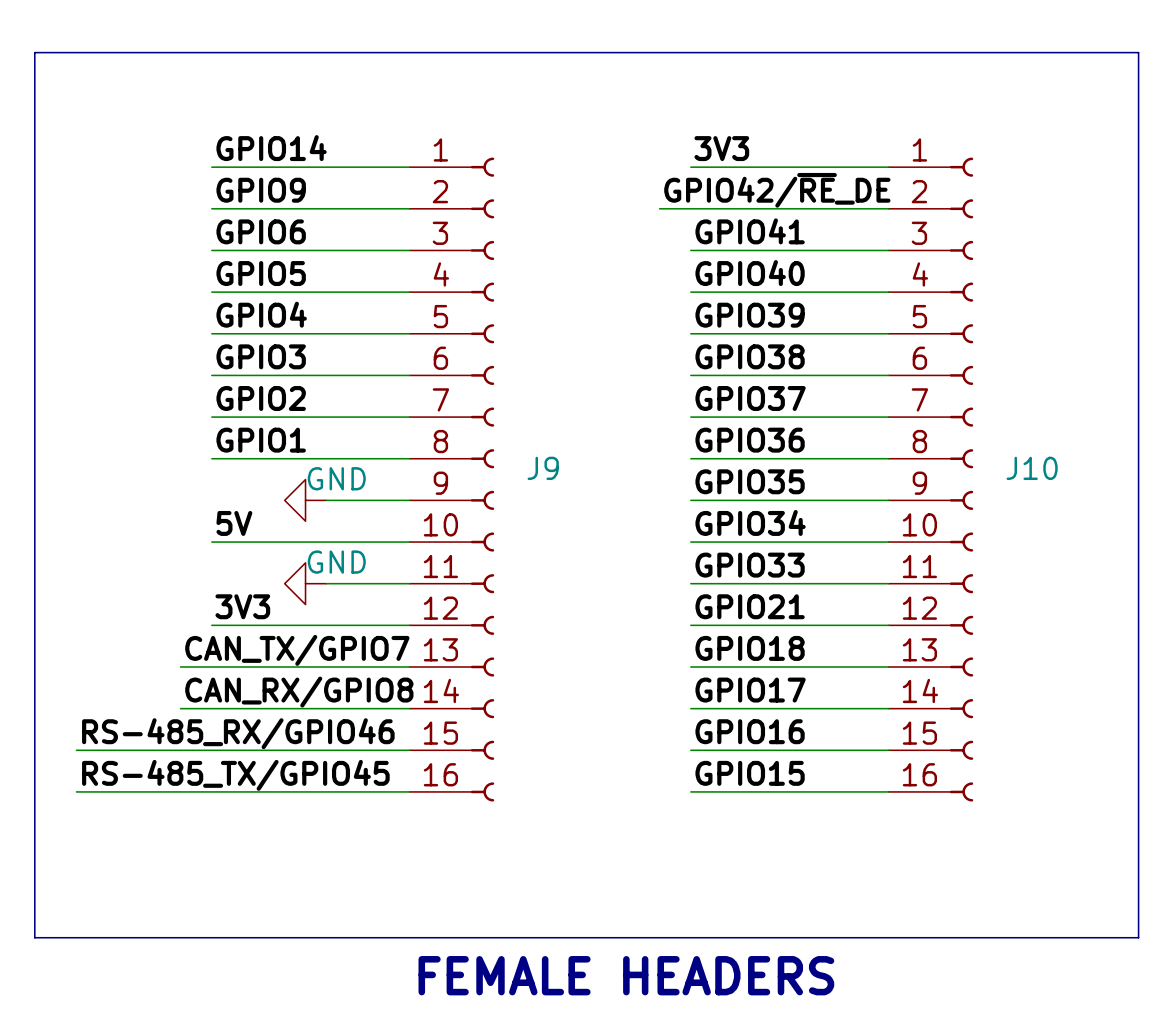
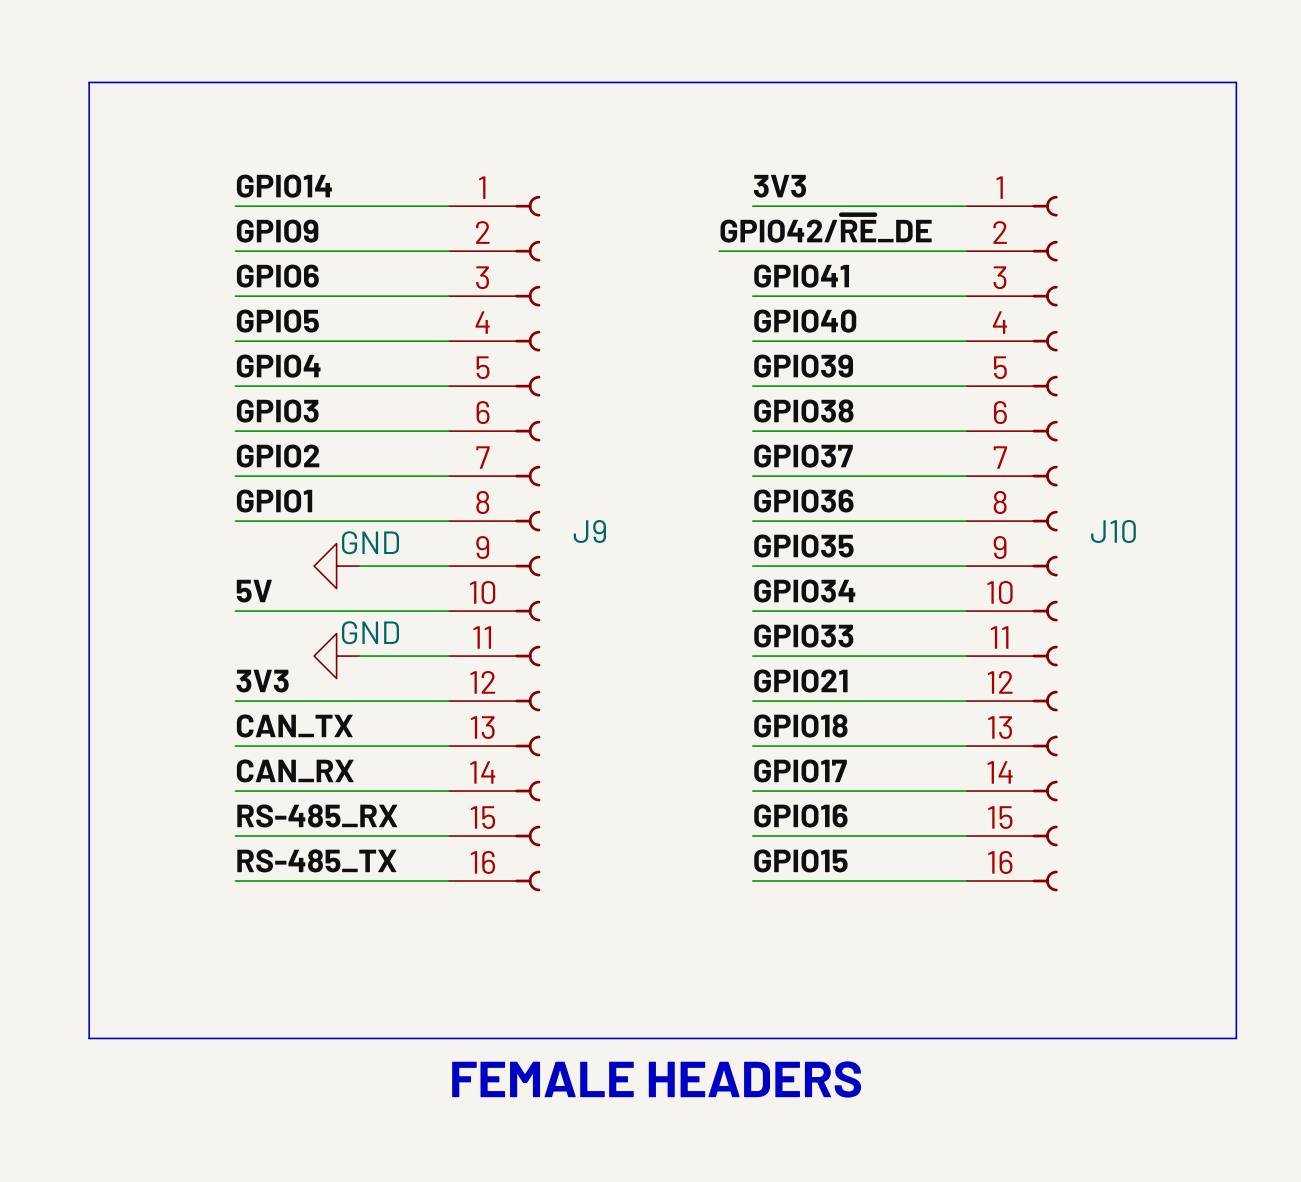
bus: (76, 52) (34, 52) (34, 937) (76, 937) -> (89, 82) (89, 1038)
label: CAN_TX/GPIO7 (297, 650) -> CAN_TX (294, 725)
wire: (180, 666) (211, 666) -> none
label: CAN_RX/GPIO8 (299, 692) -> CAN_RX (295, 770)
wire: (180, 708) (211, 708) -> none
label: none -> RS-485_RX (317, 815)
label: RS-485_RX/GPIO46 (238, 733) -> none
wire: (76, 750) (211, 750) -> none
label: none -> RS-485_TX (316, 860)
label: RS-485_TX/GPIO45 (235, 775) -> none
wire: (76, 791) (211, 791) -> none

